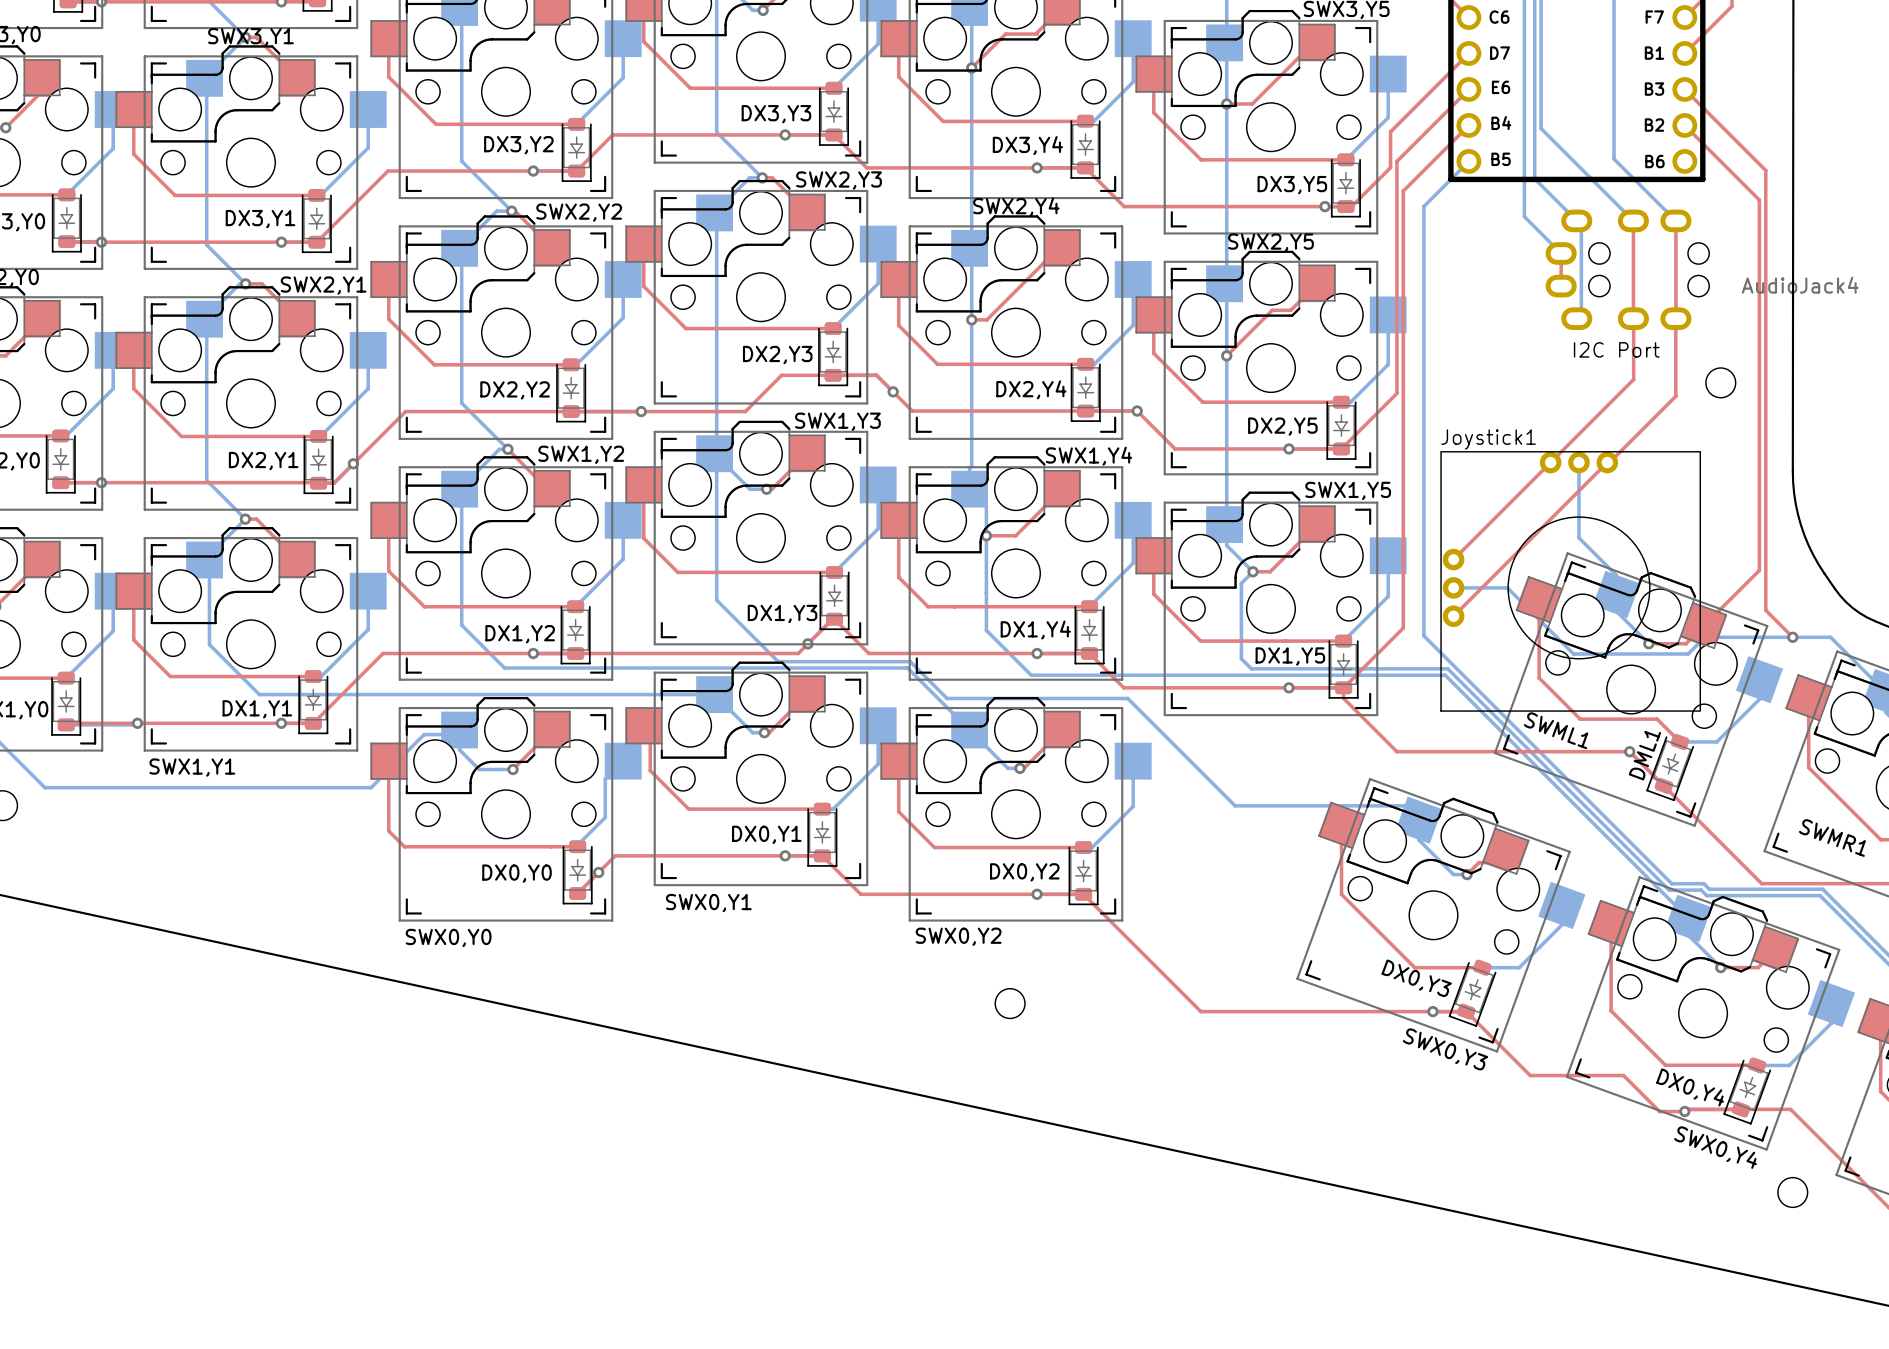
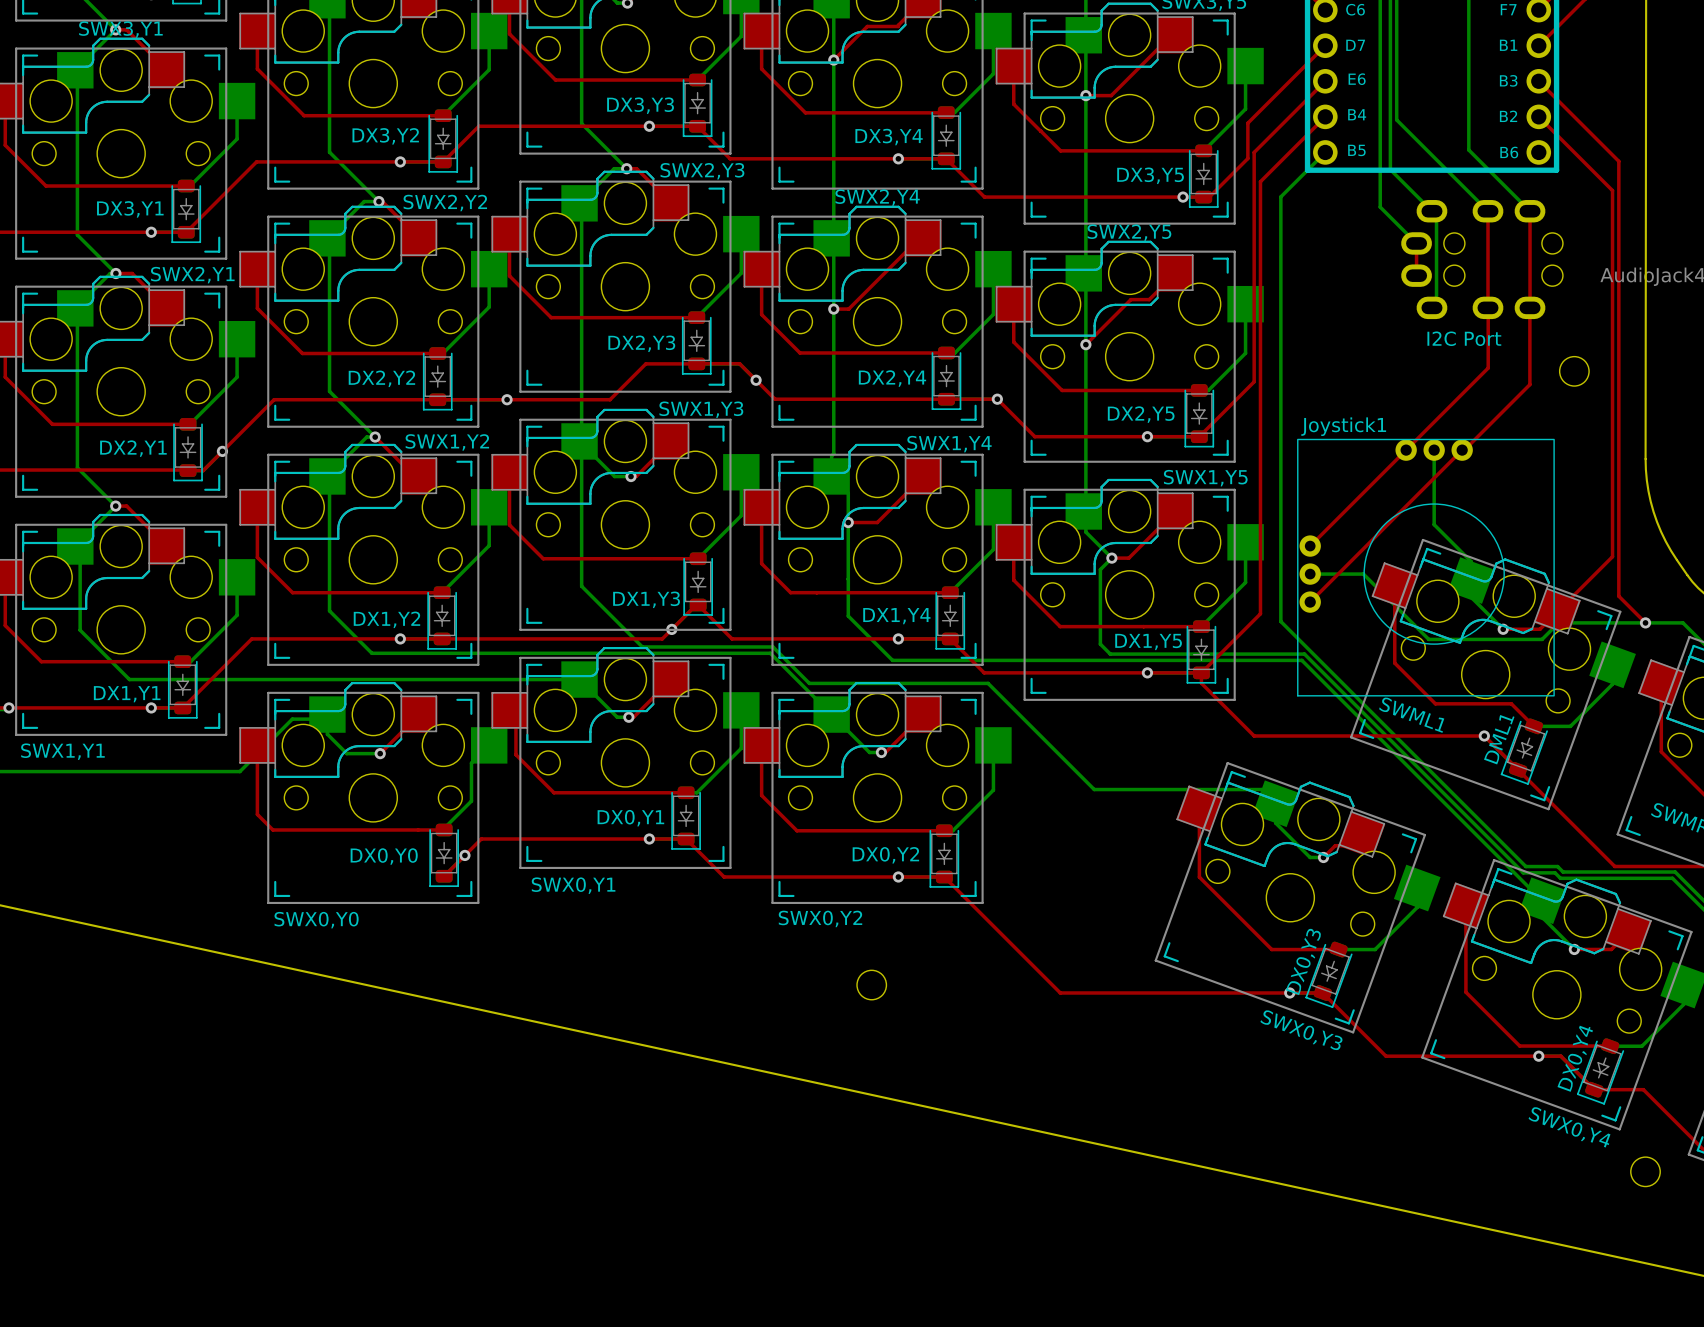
DX0,Y3 name rotation: 0° (1416, 978) -> 90° counterclockwise (1303, 961)
top track: (1623, 1075) (1659, 1111) (1741, 1109) -> (1478, 1056) (1560, 1056) (1594, 1089)
DX0,Y4 name rotation: 0° (1690, 1087) -> 90° counterclockwise (1575, 1058)
via position: (1684, 1111) -> (1538, 1056)

